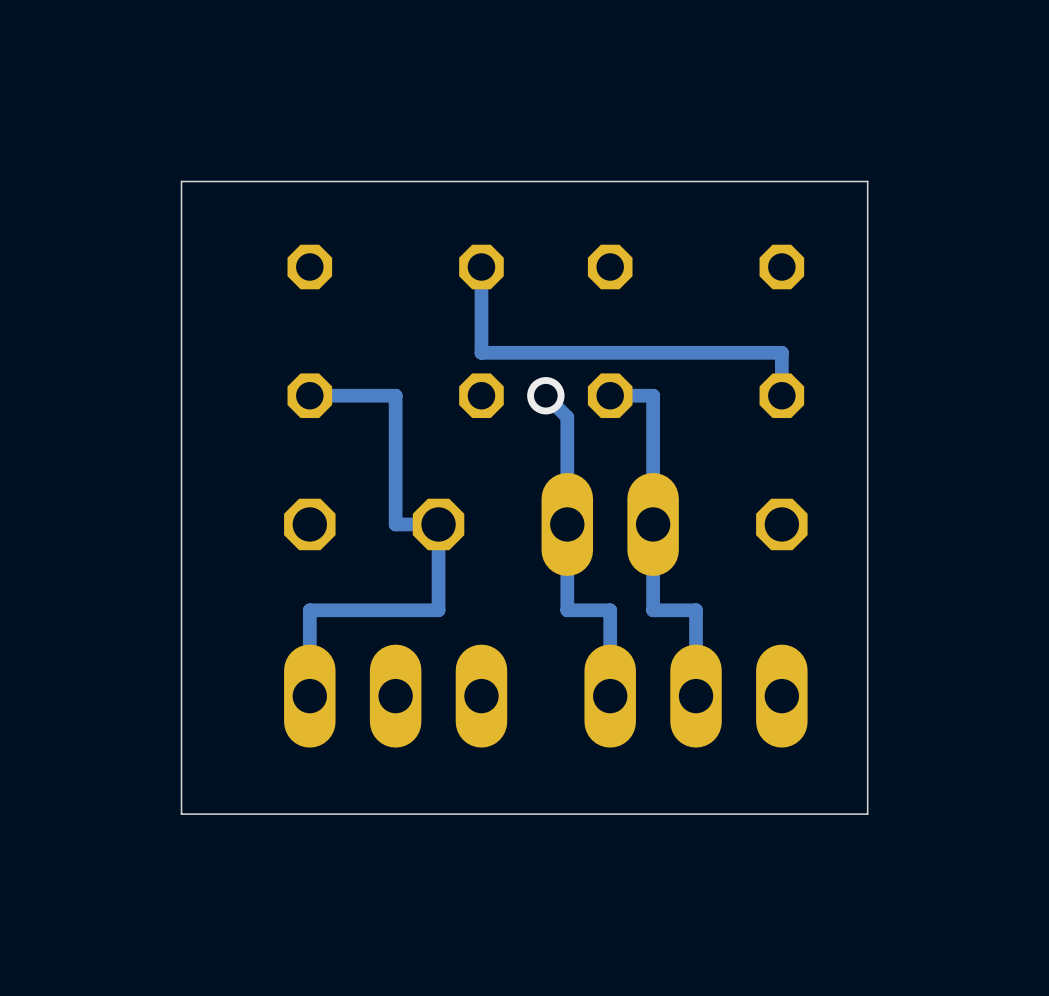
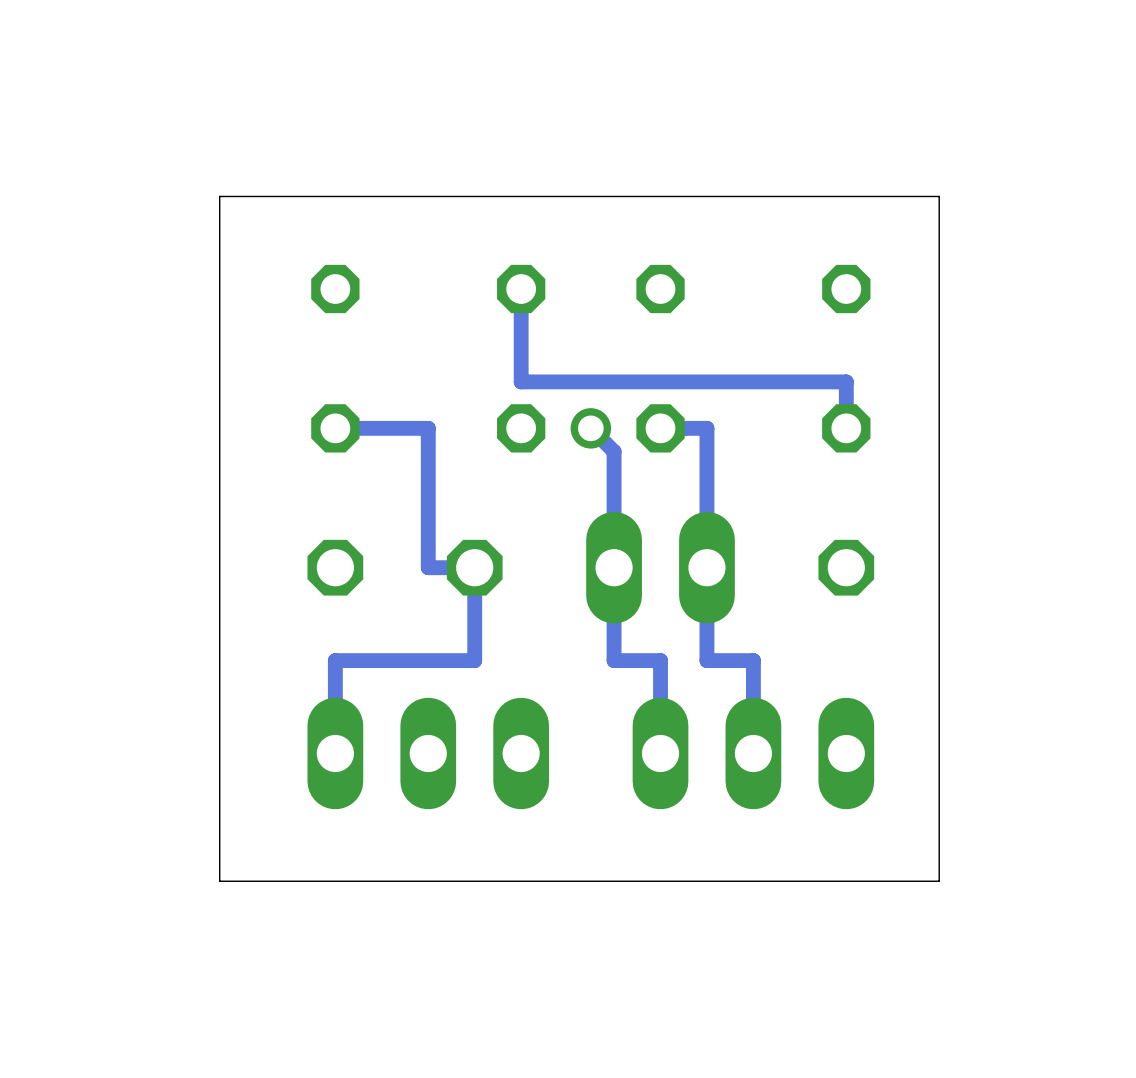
board edge: (202, 181) (181, 181) (181, 814) (202, 814) -> (219, 196) (219, 881)

